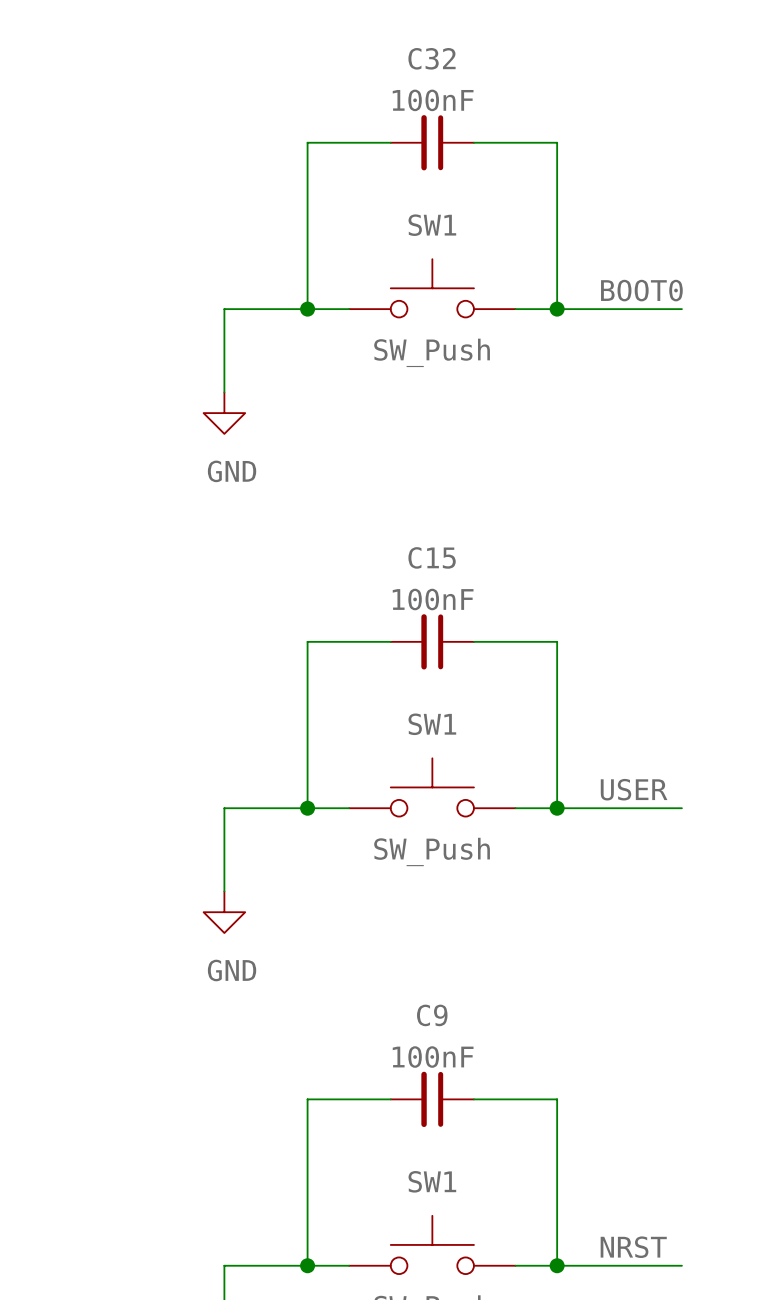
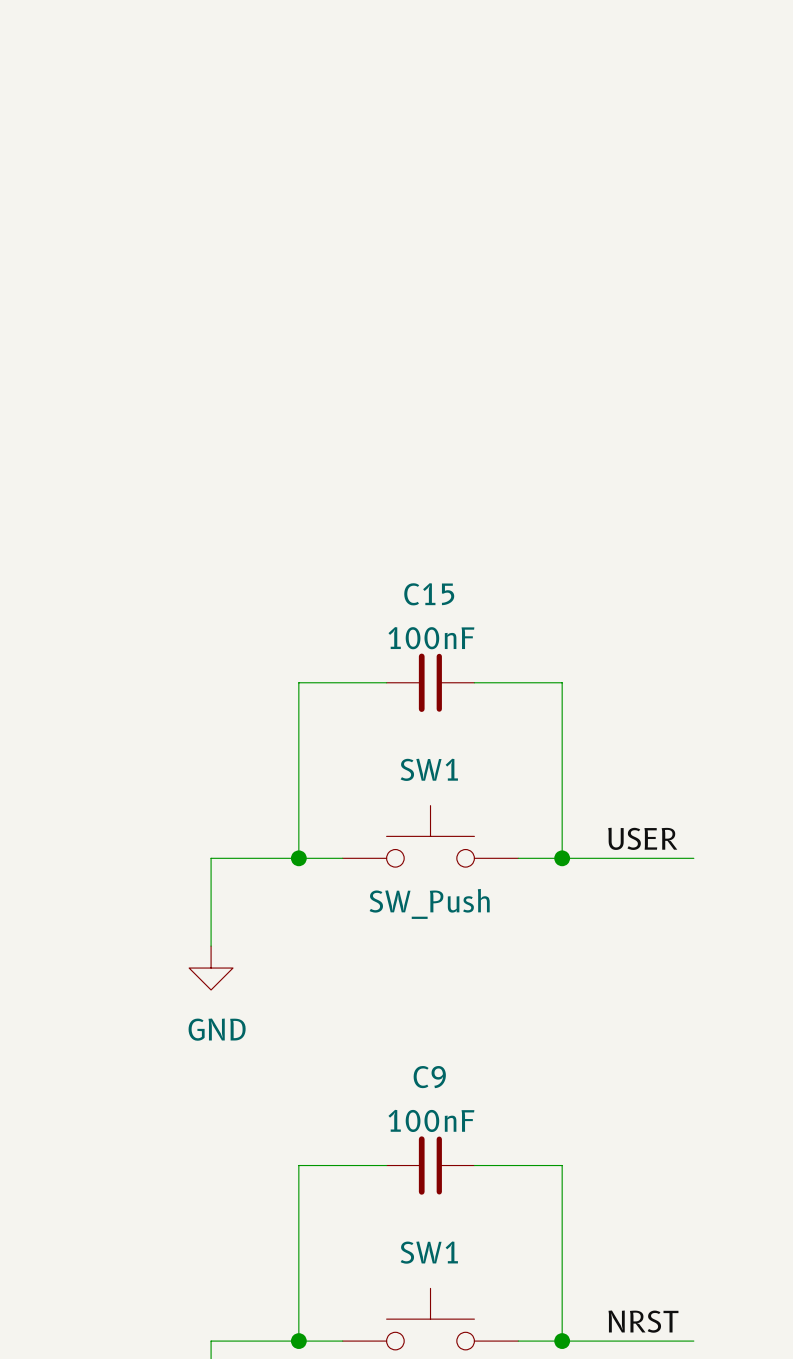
wire: (390, 142) (307, 142) (307, 309) -> none
C32: 100nF (432, 142) -> none
wire: (473, 142) (557, 142) (557, 309) -> none
SW1: SW_Push (432, 288) -> none
label: BOOT0 (641, 290) -> none
junction: (307, 309) -> none
wire: (349, 309) (224, 309) (224, 392) -> none
wire: (515, 309) (681, 309) -> none
junction: (557, 309) -> none
power symbol: GND (224, 413) -> none

